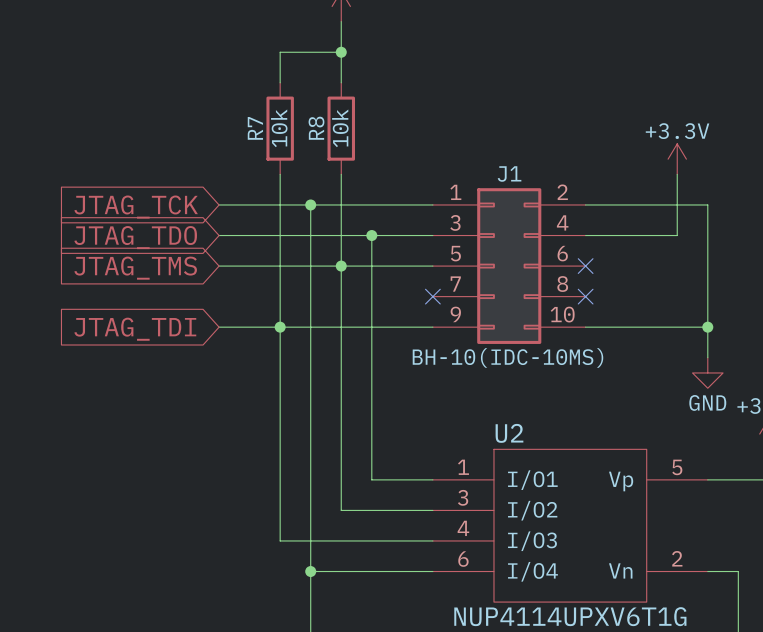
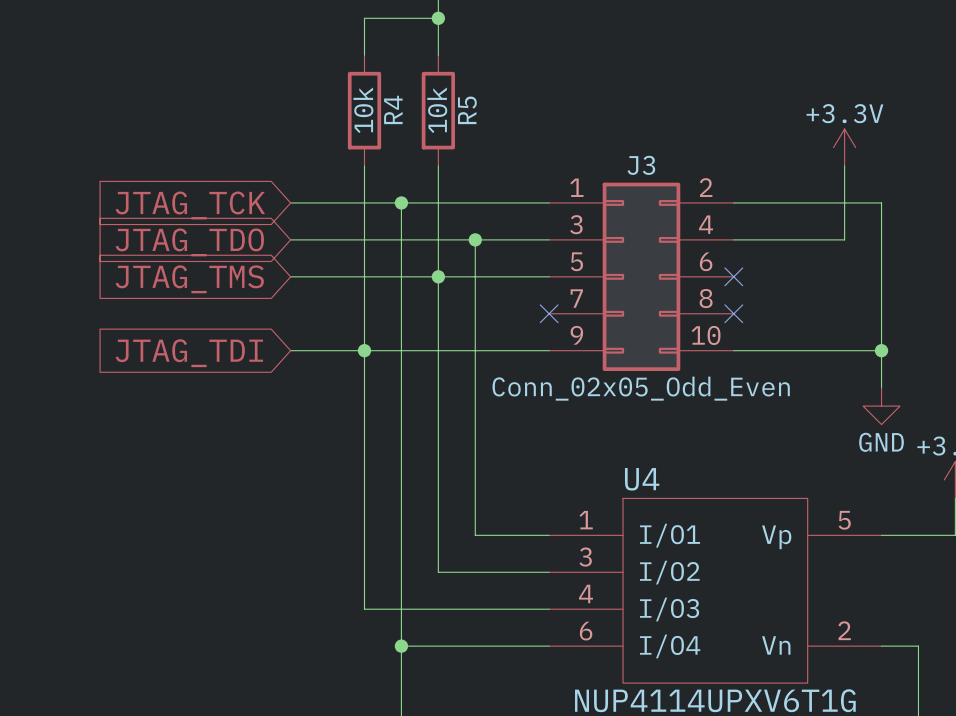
R7 name: R7 (255, 128) -> R4 (393, 109)
R8 name: R8 (316, 128) -> R5 (467, 110)
J1 name: J1 (509, 174) -> J3 (641, 165)
J1 value: BH-10(IDC-10MS) (507, 357) -> Conn_02x05_Odd_Even (641, 388)
U2 name: U2 (509, 433) -> U4 (642, 479)

